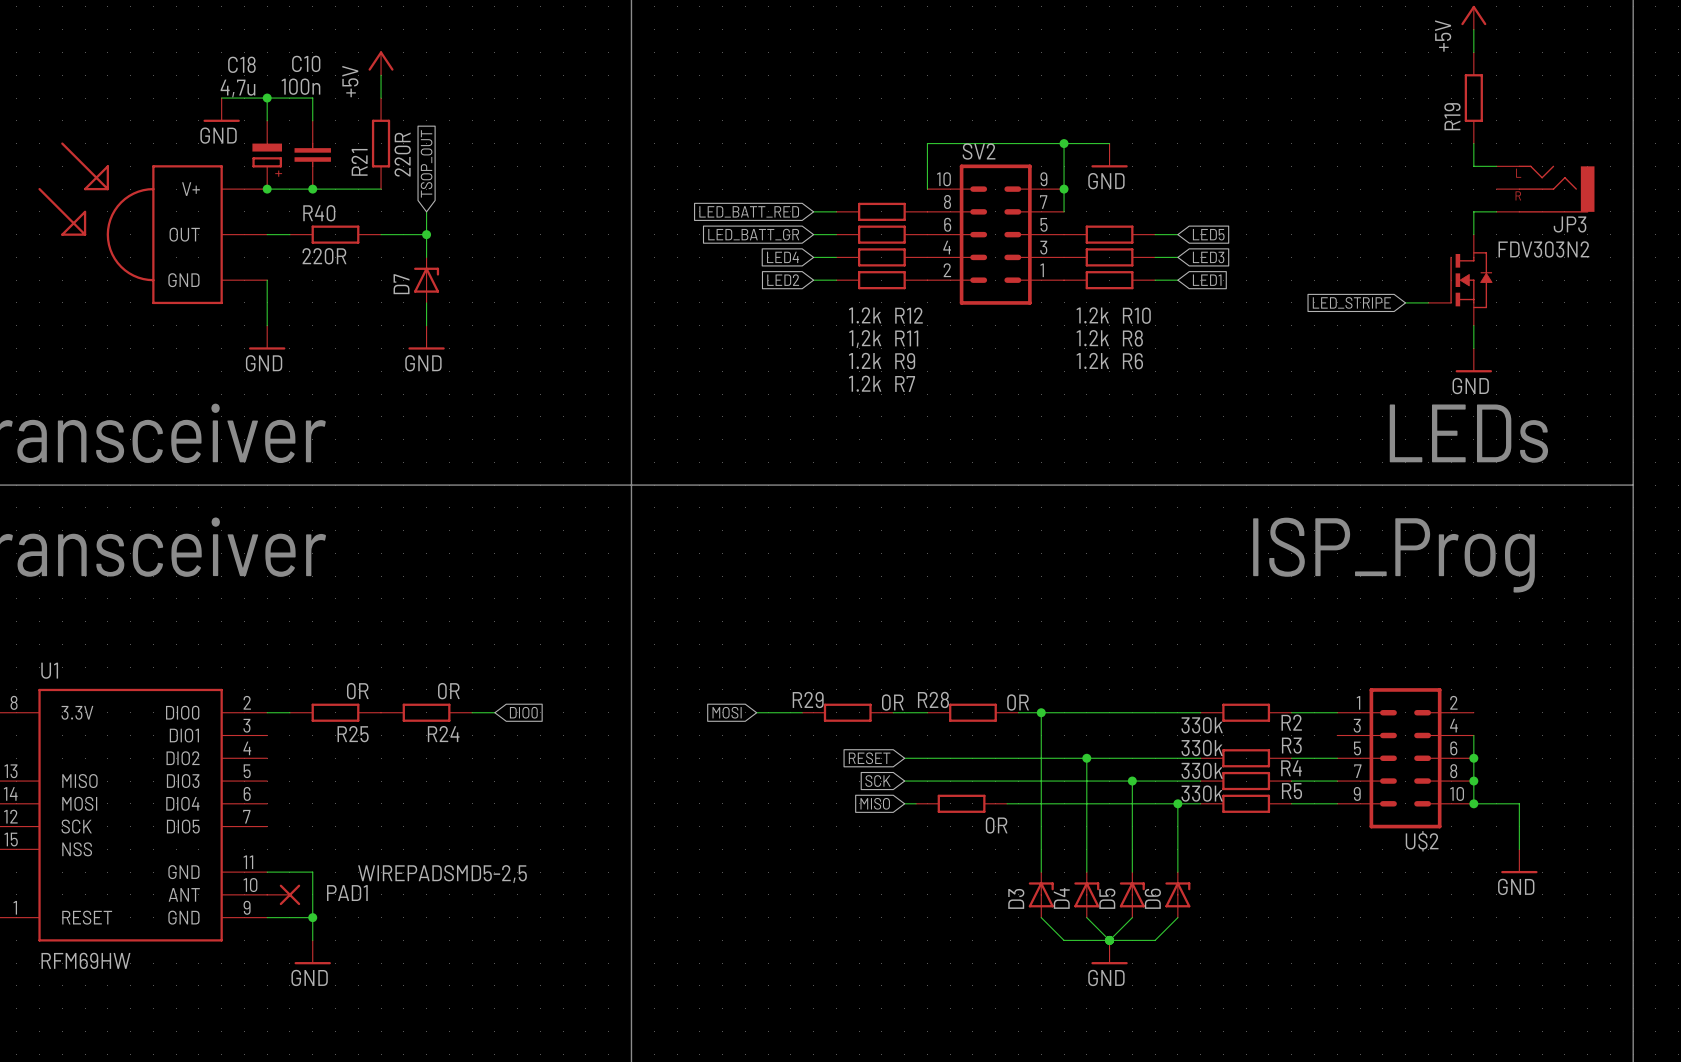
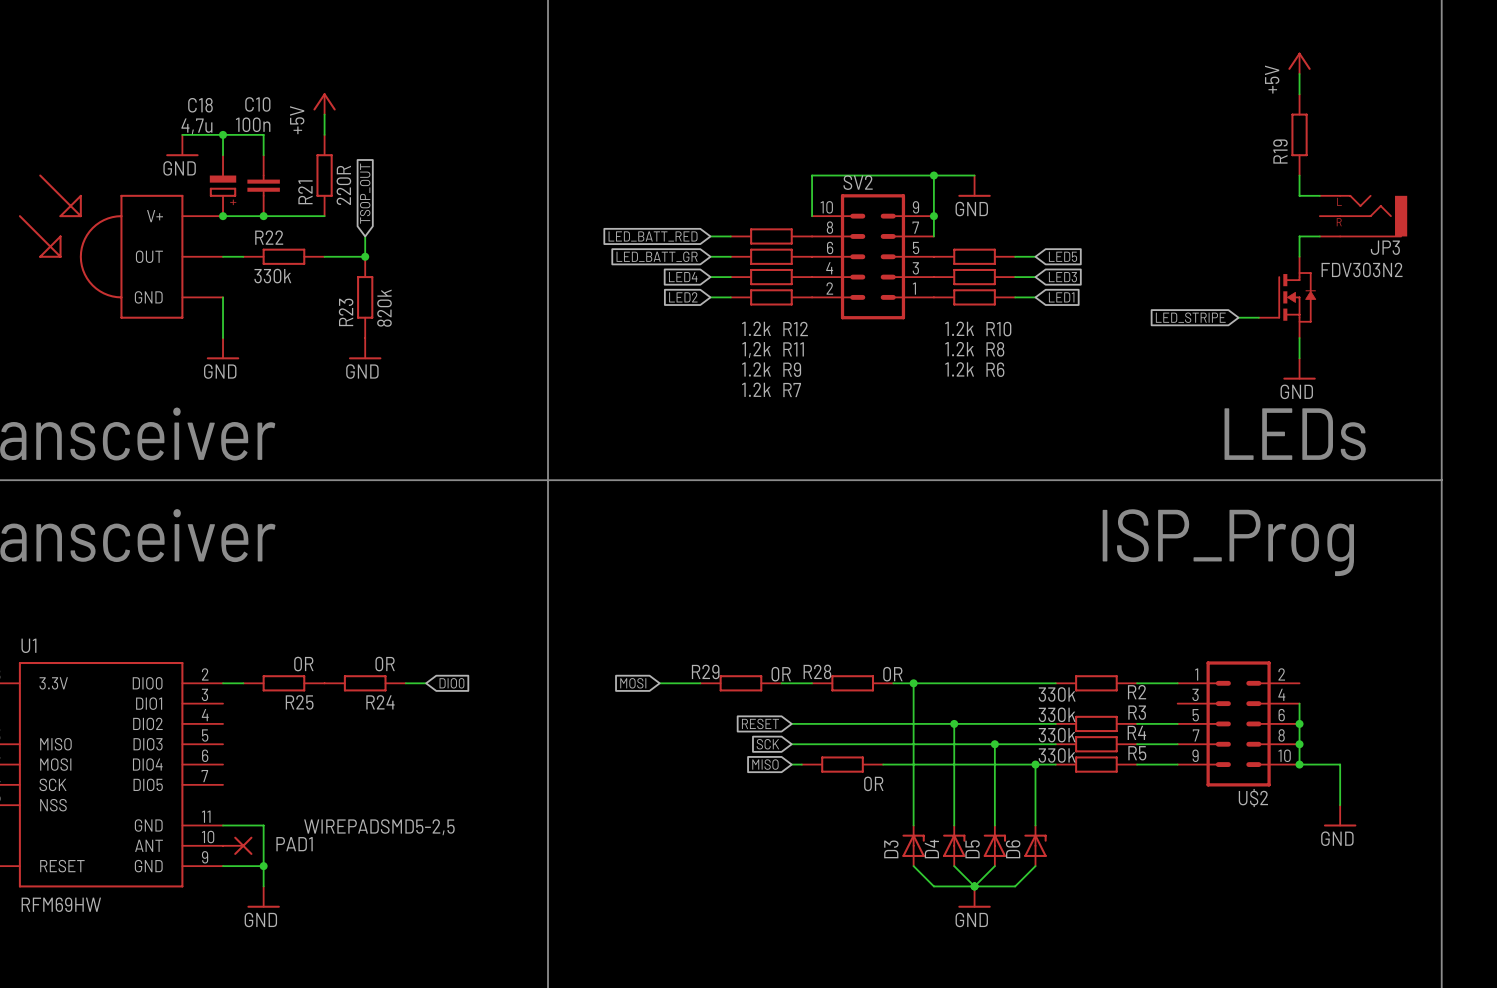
R40 name: R40 (319, 213) -> R22 (269, 237)
R40 value: 220R (324, 256) -> 330k (272, 276)
D7: (426, 280) -> none
R23: none -> 820k (365, 297)

